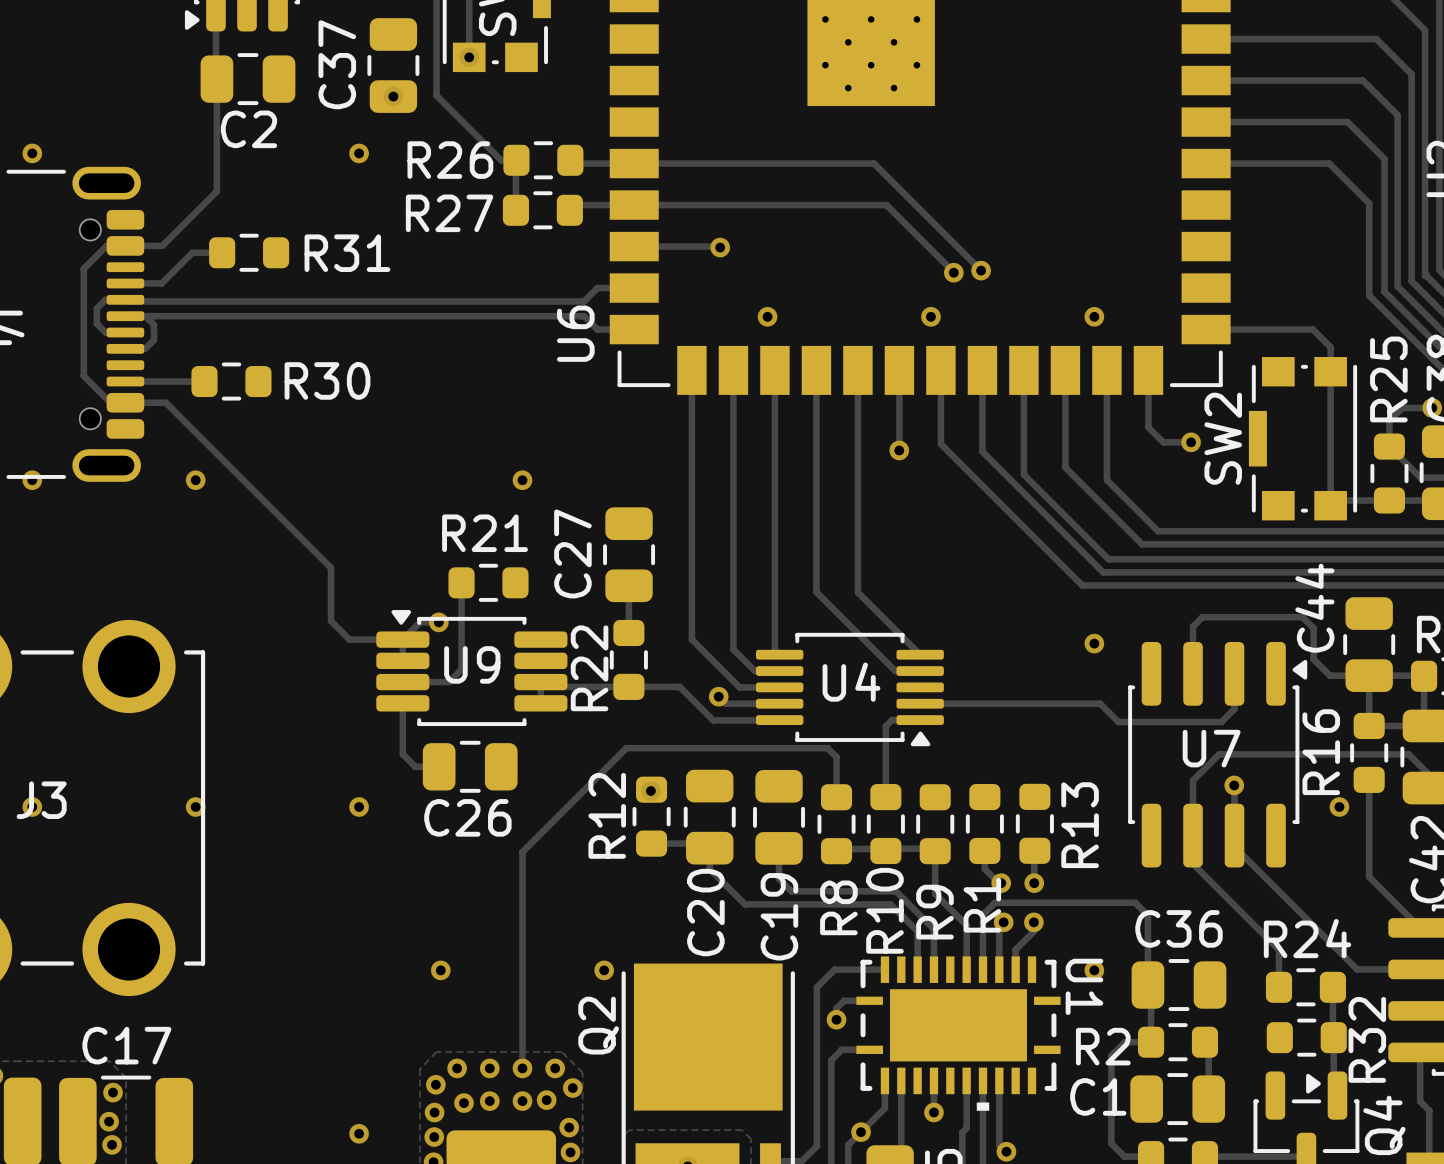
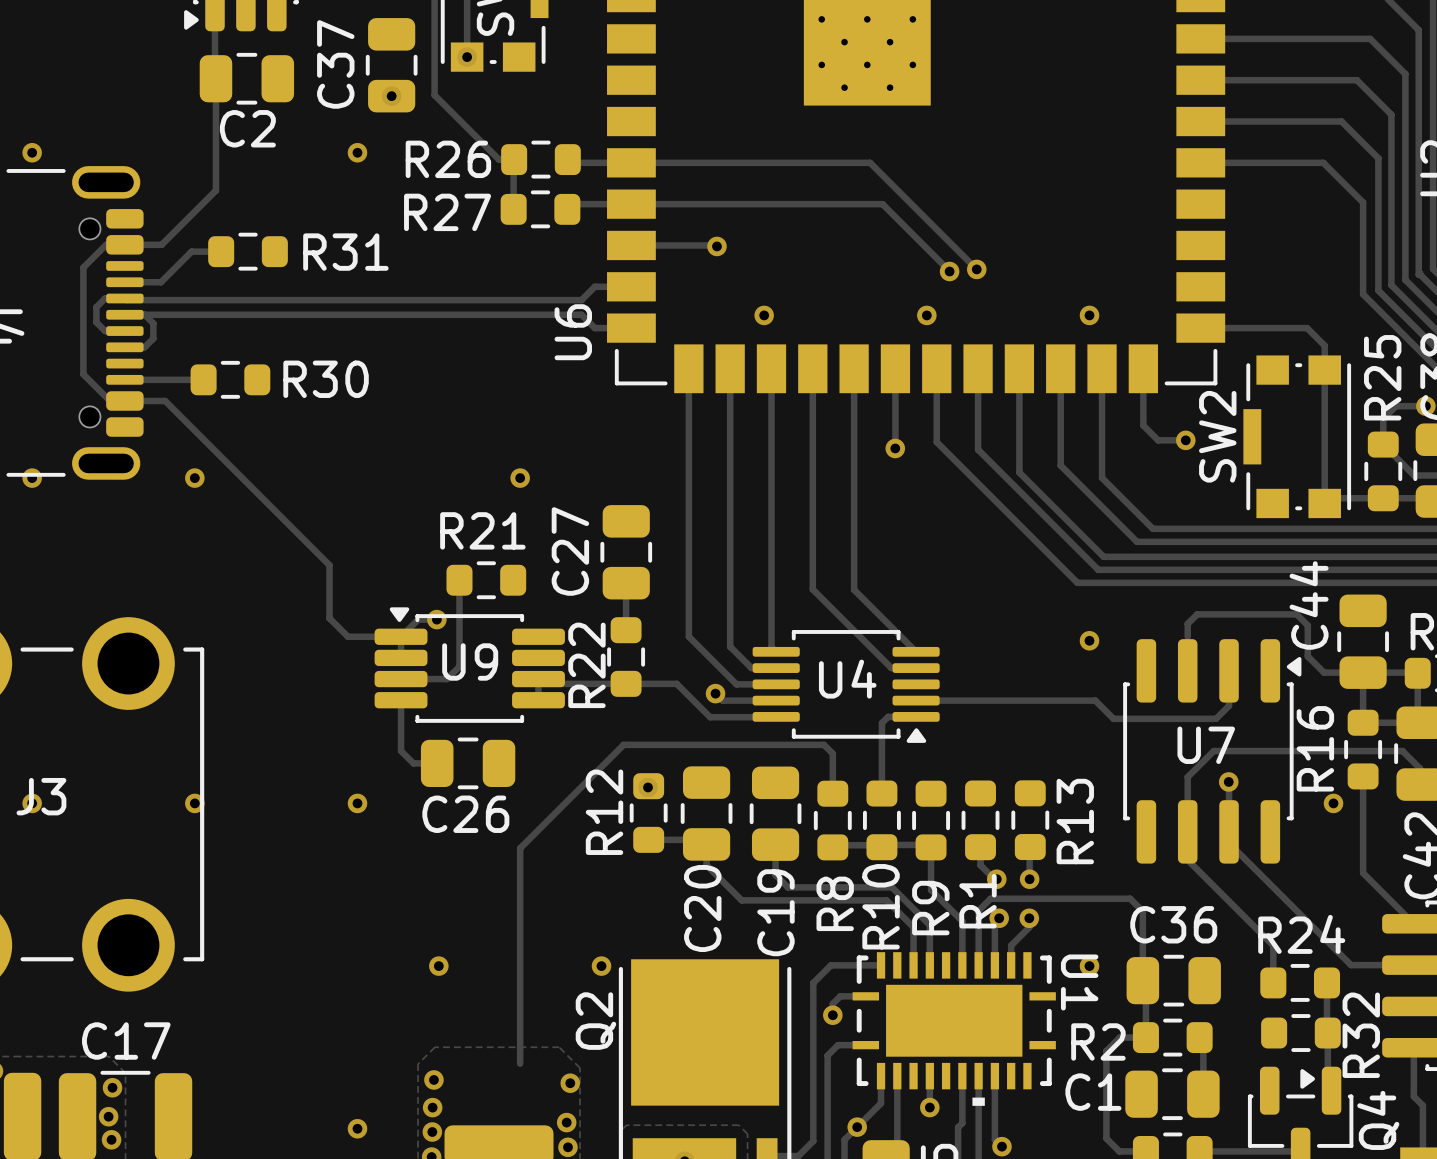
via: (457, 1068) -> none
via: (489, 1068) -> none
via: (522, 1068) -> none
via: (555, 1068) -> none
via: (546, 1100) -> none
via: (489, 1101) -> none
via: (522, 1101) -> none
via: (463, 1103) -> none

